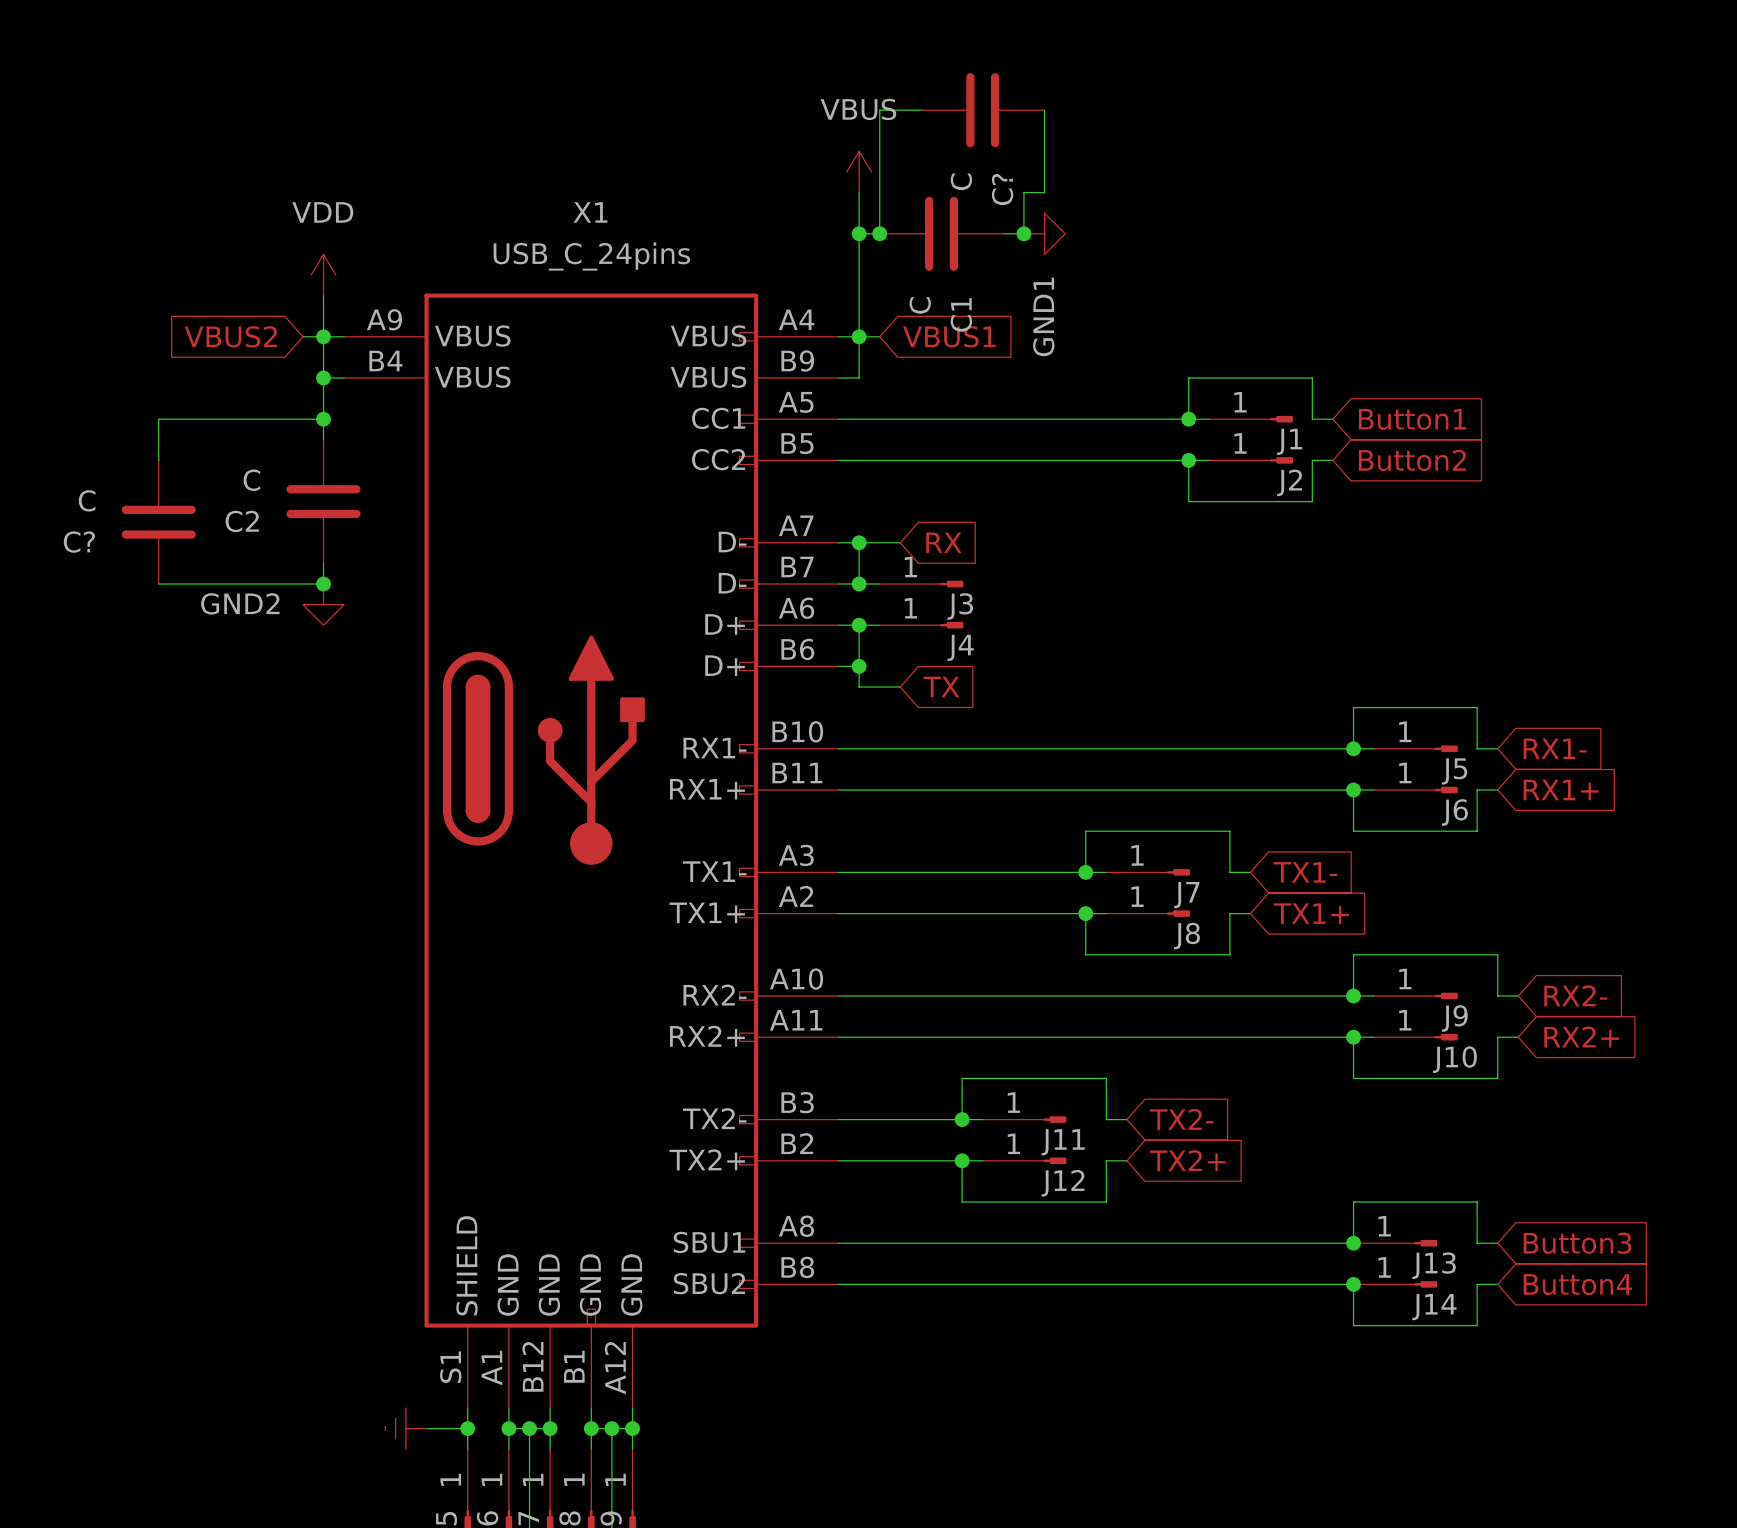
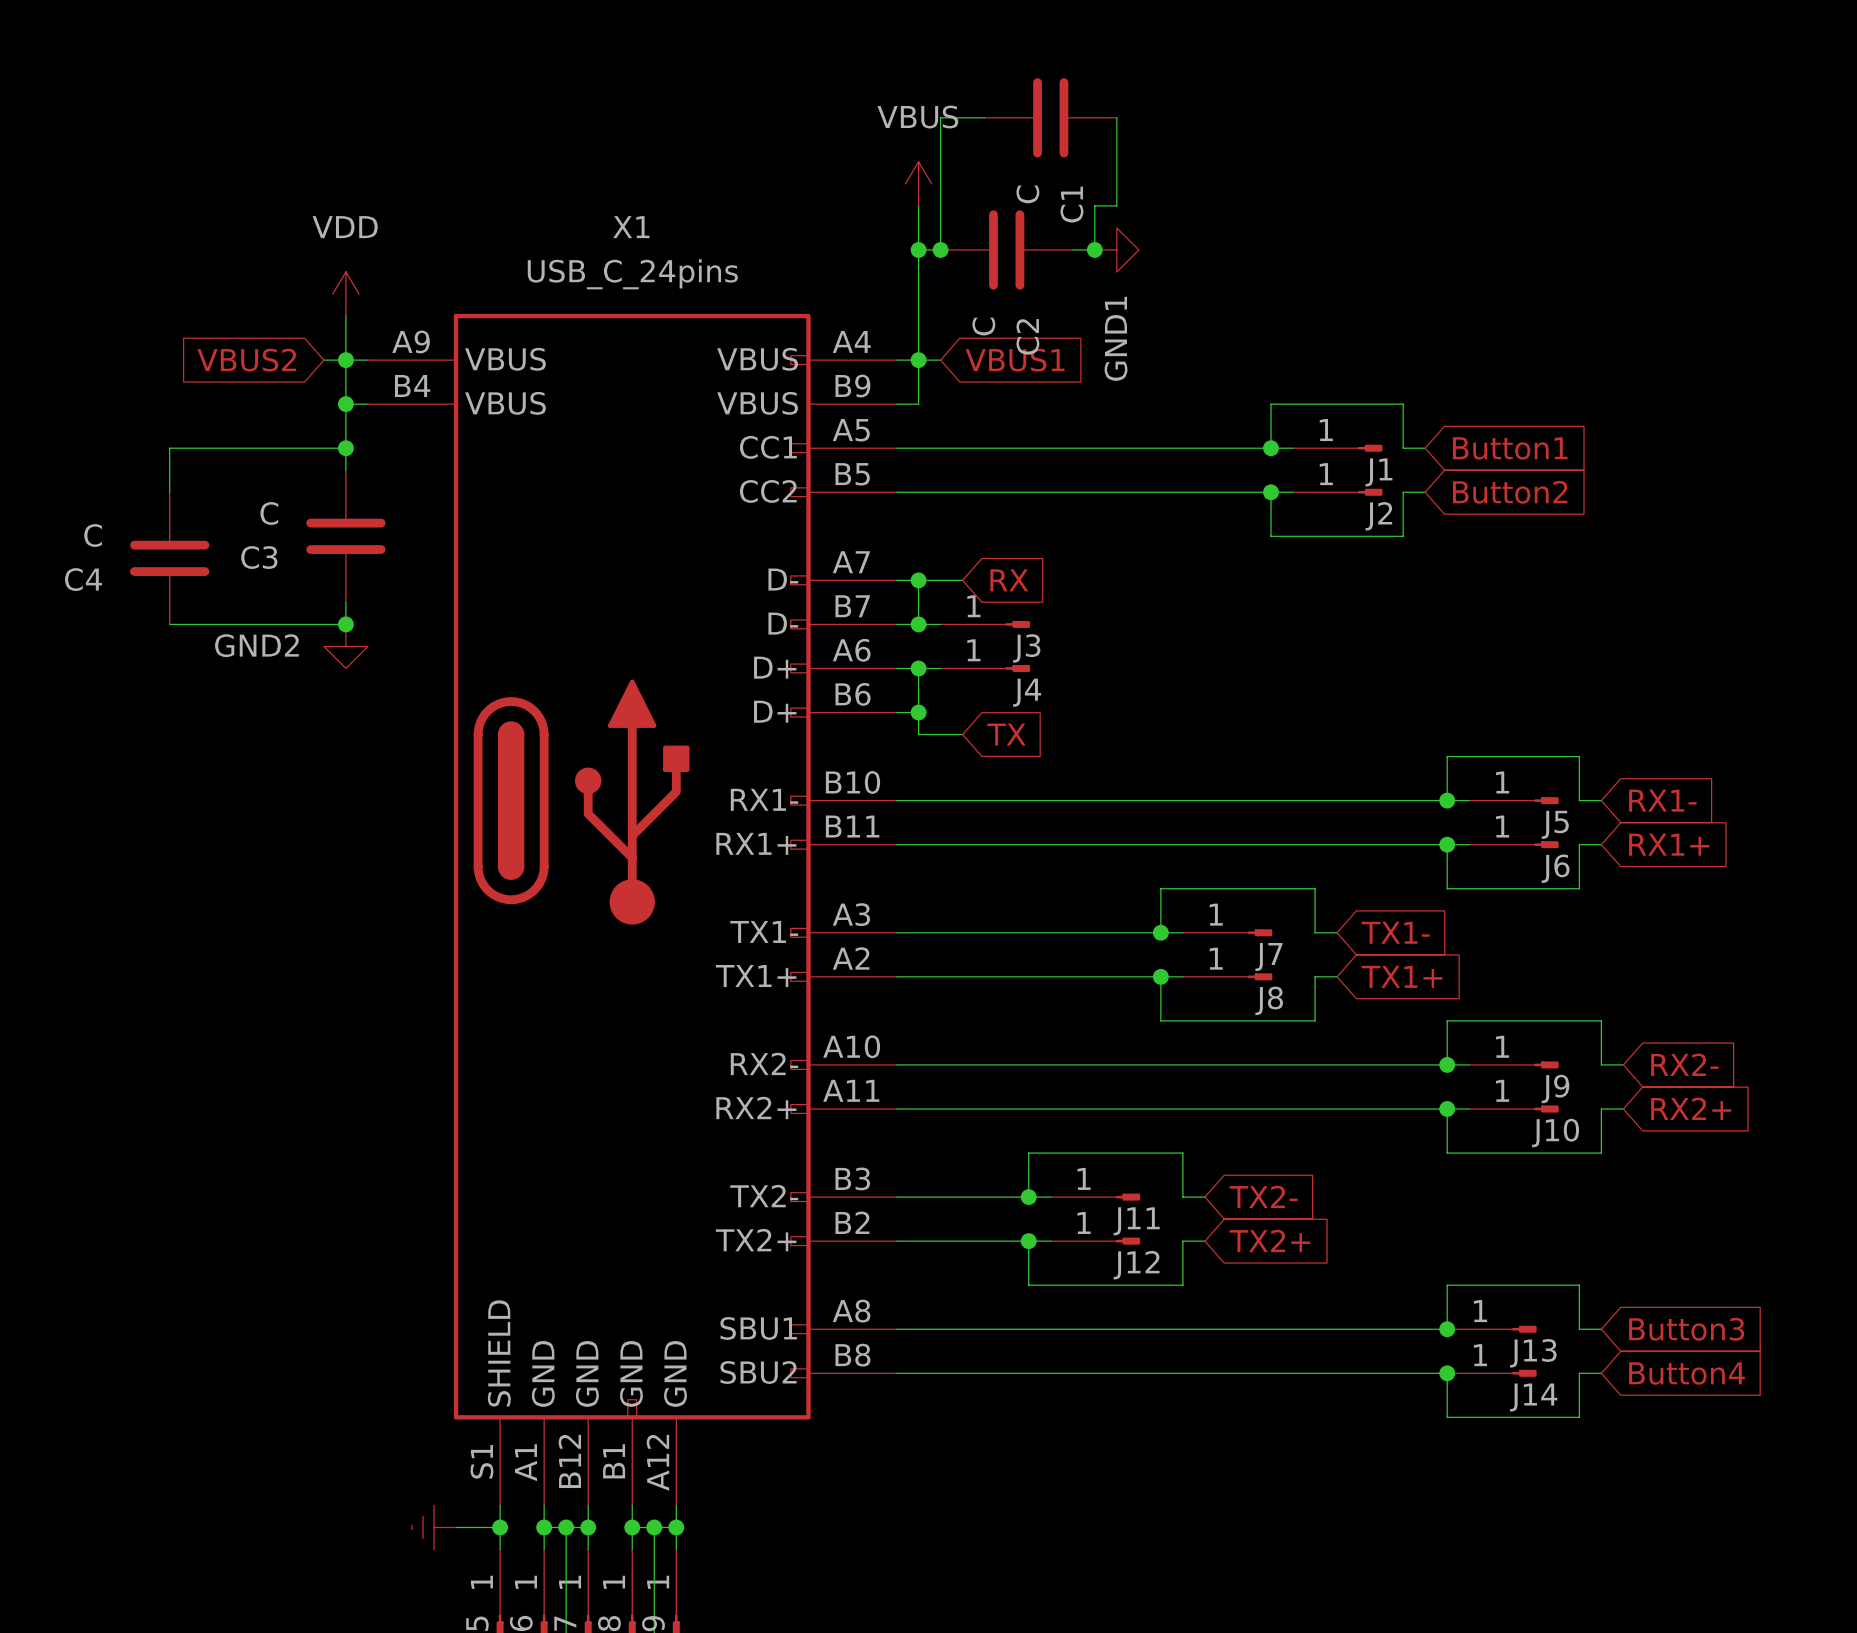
C? name: C? (1002, 189) -> C1 (1071, 204)
C1 name: C1 (961, 314) -> C2 (1027, 336)
C2 name: C2 (242, 521) -> C3 (259, 557)
C? name: C? (79, 542) -> C4 (83, 579)

